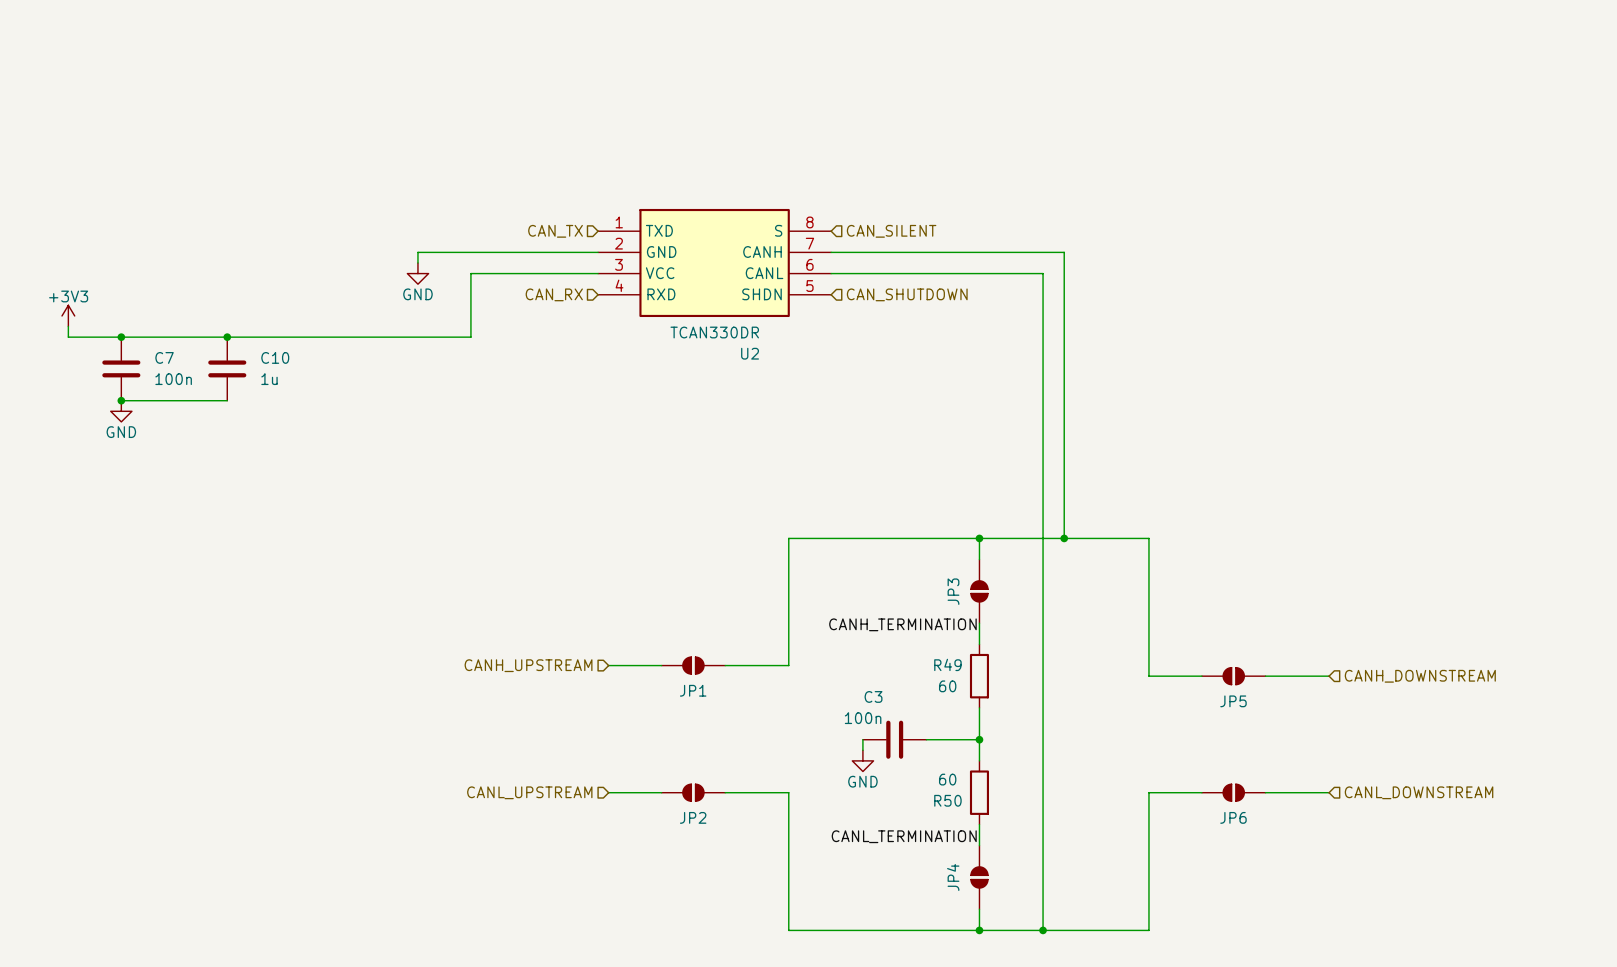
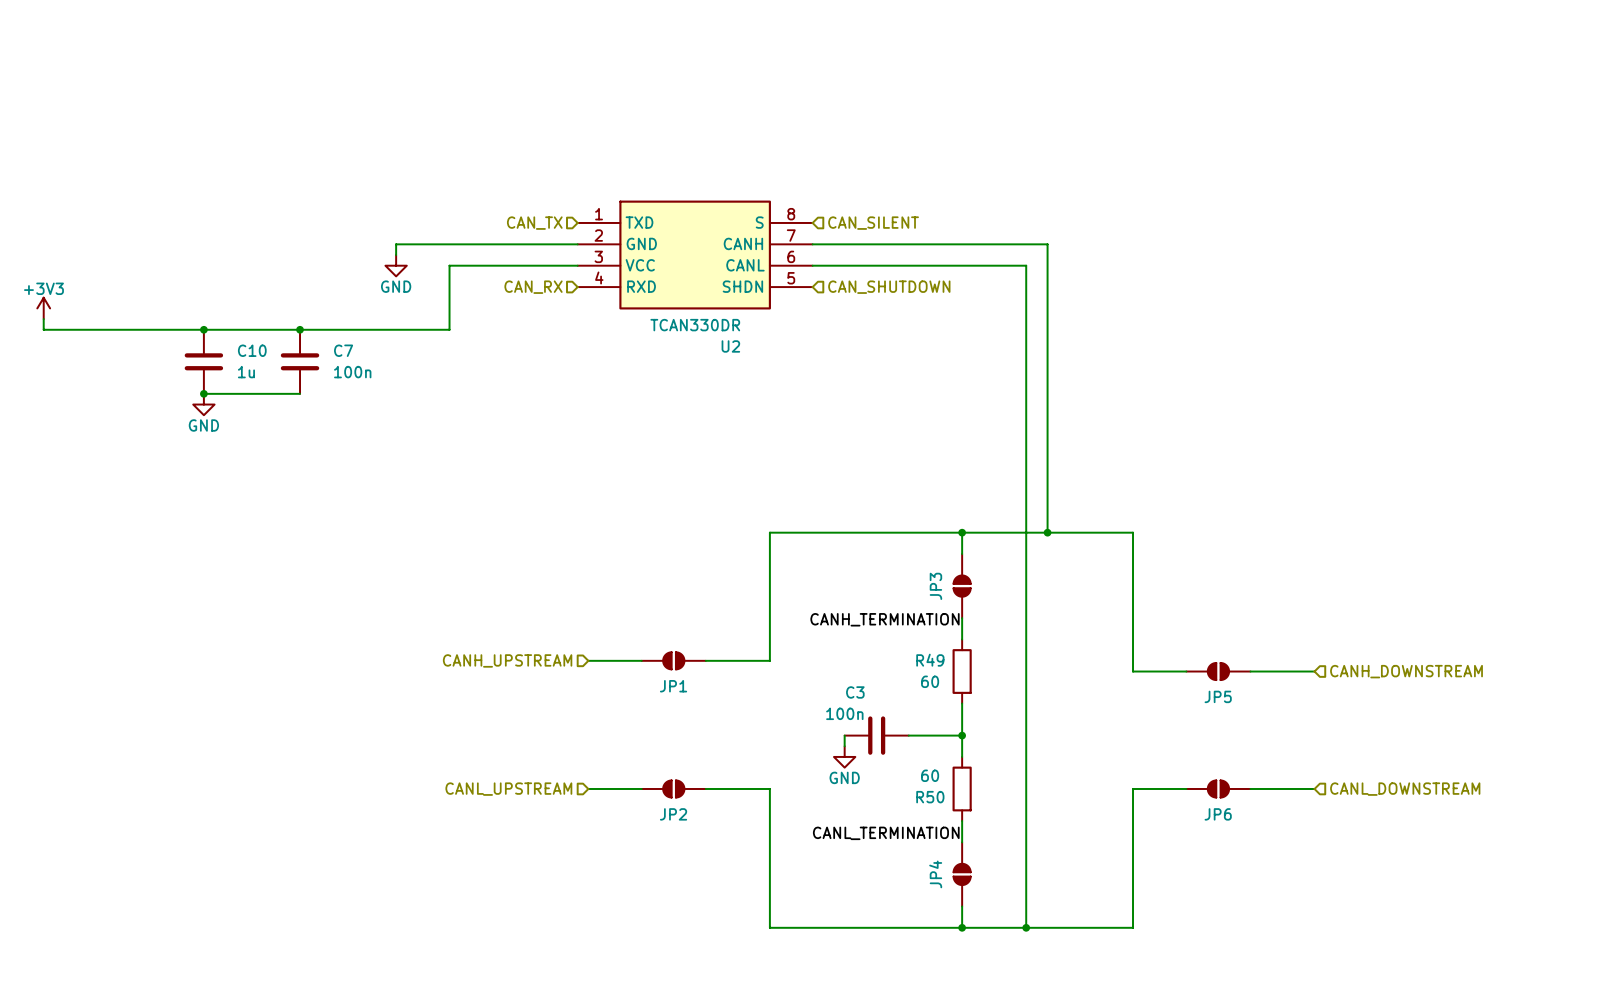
junction: (121, 337) -> none
junction: none -> (300, 329)
C7 position: (121, 368) -> (300, 361)
wire: (121, 400) (227, 400) -> (300, 393) (203, 393)
junction: (121, 400) -> none
junction: none -> (203, 393)
power symbol position: GND (121, 411) -> GND (203, 404)

